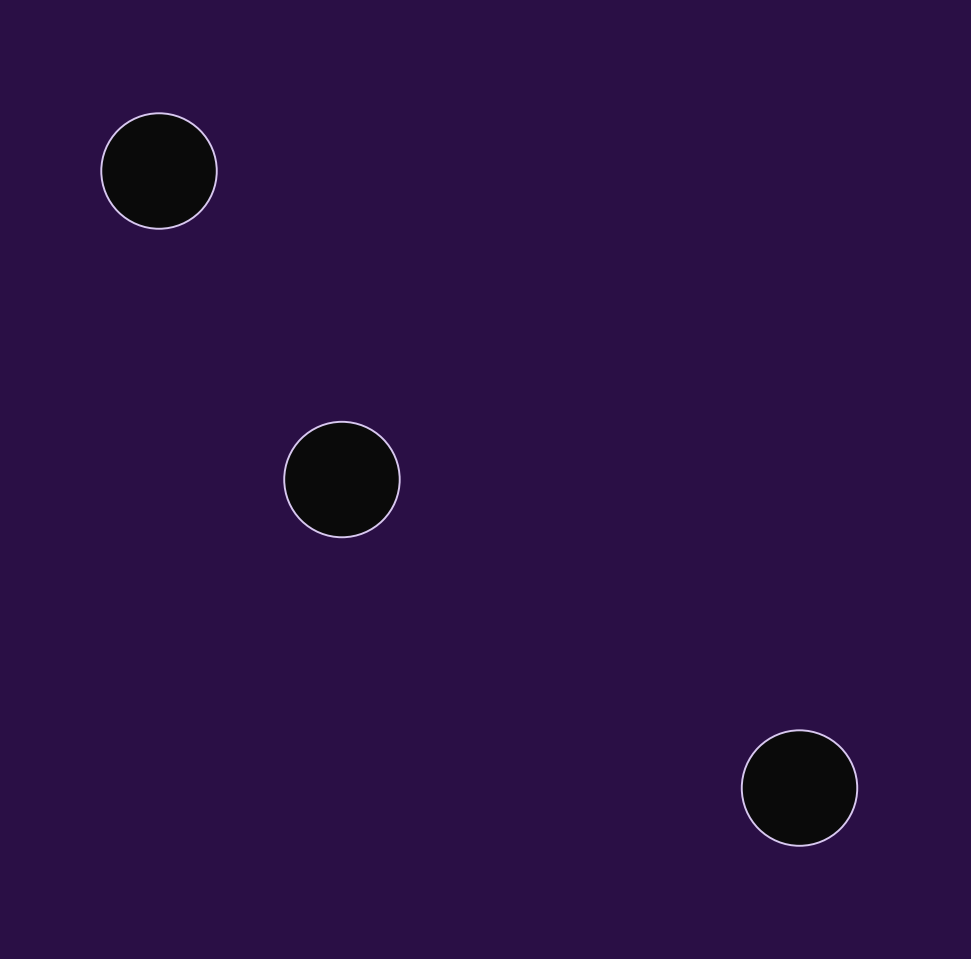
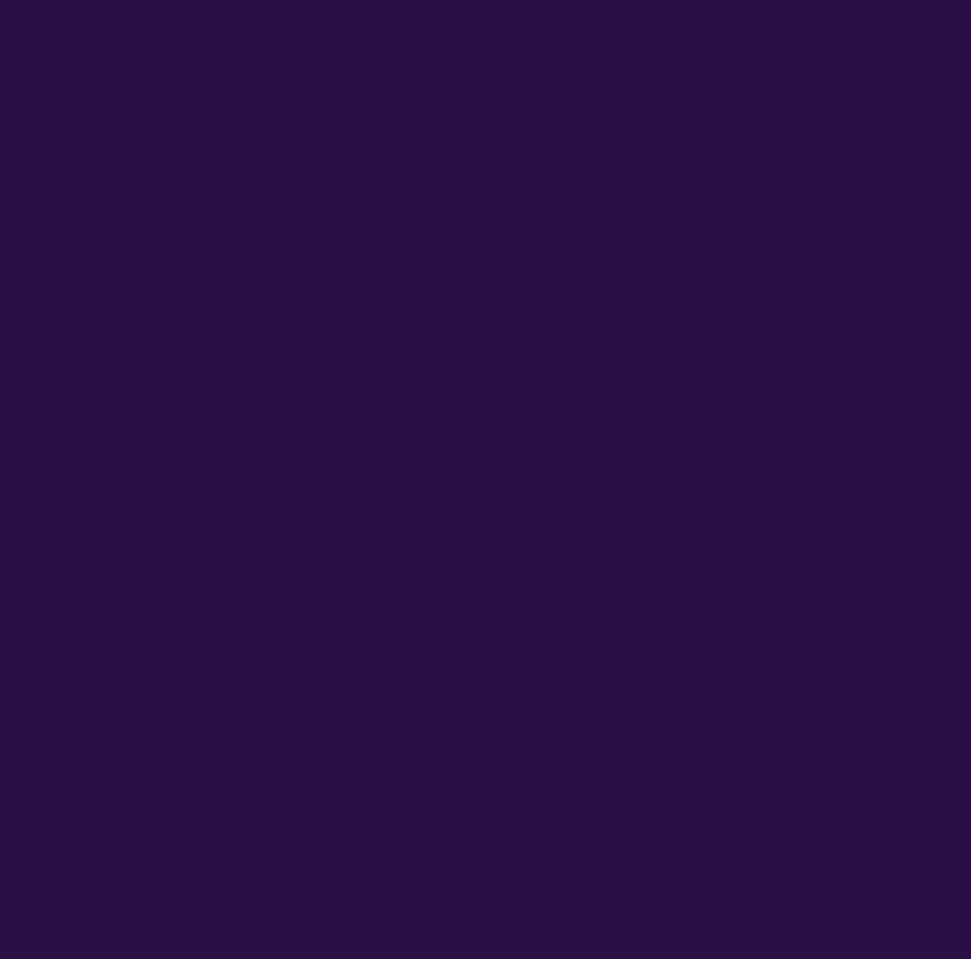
part: (159, 171) -> none
part: (341, 479) -> none
part: (799, 788) -> none

